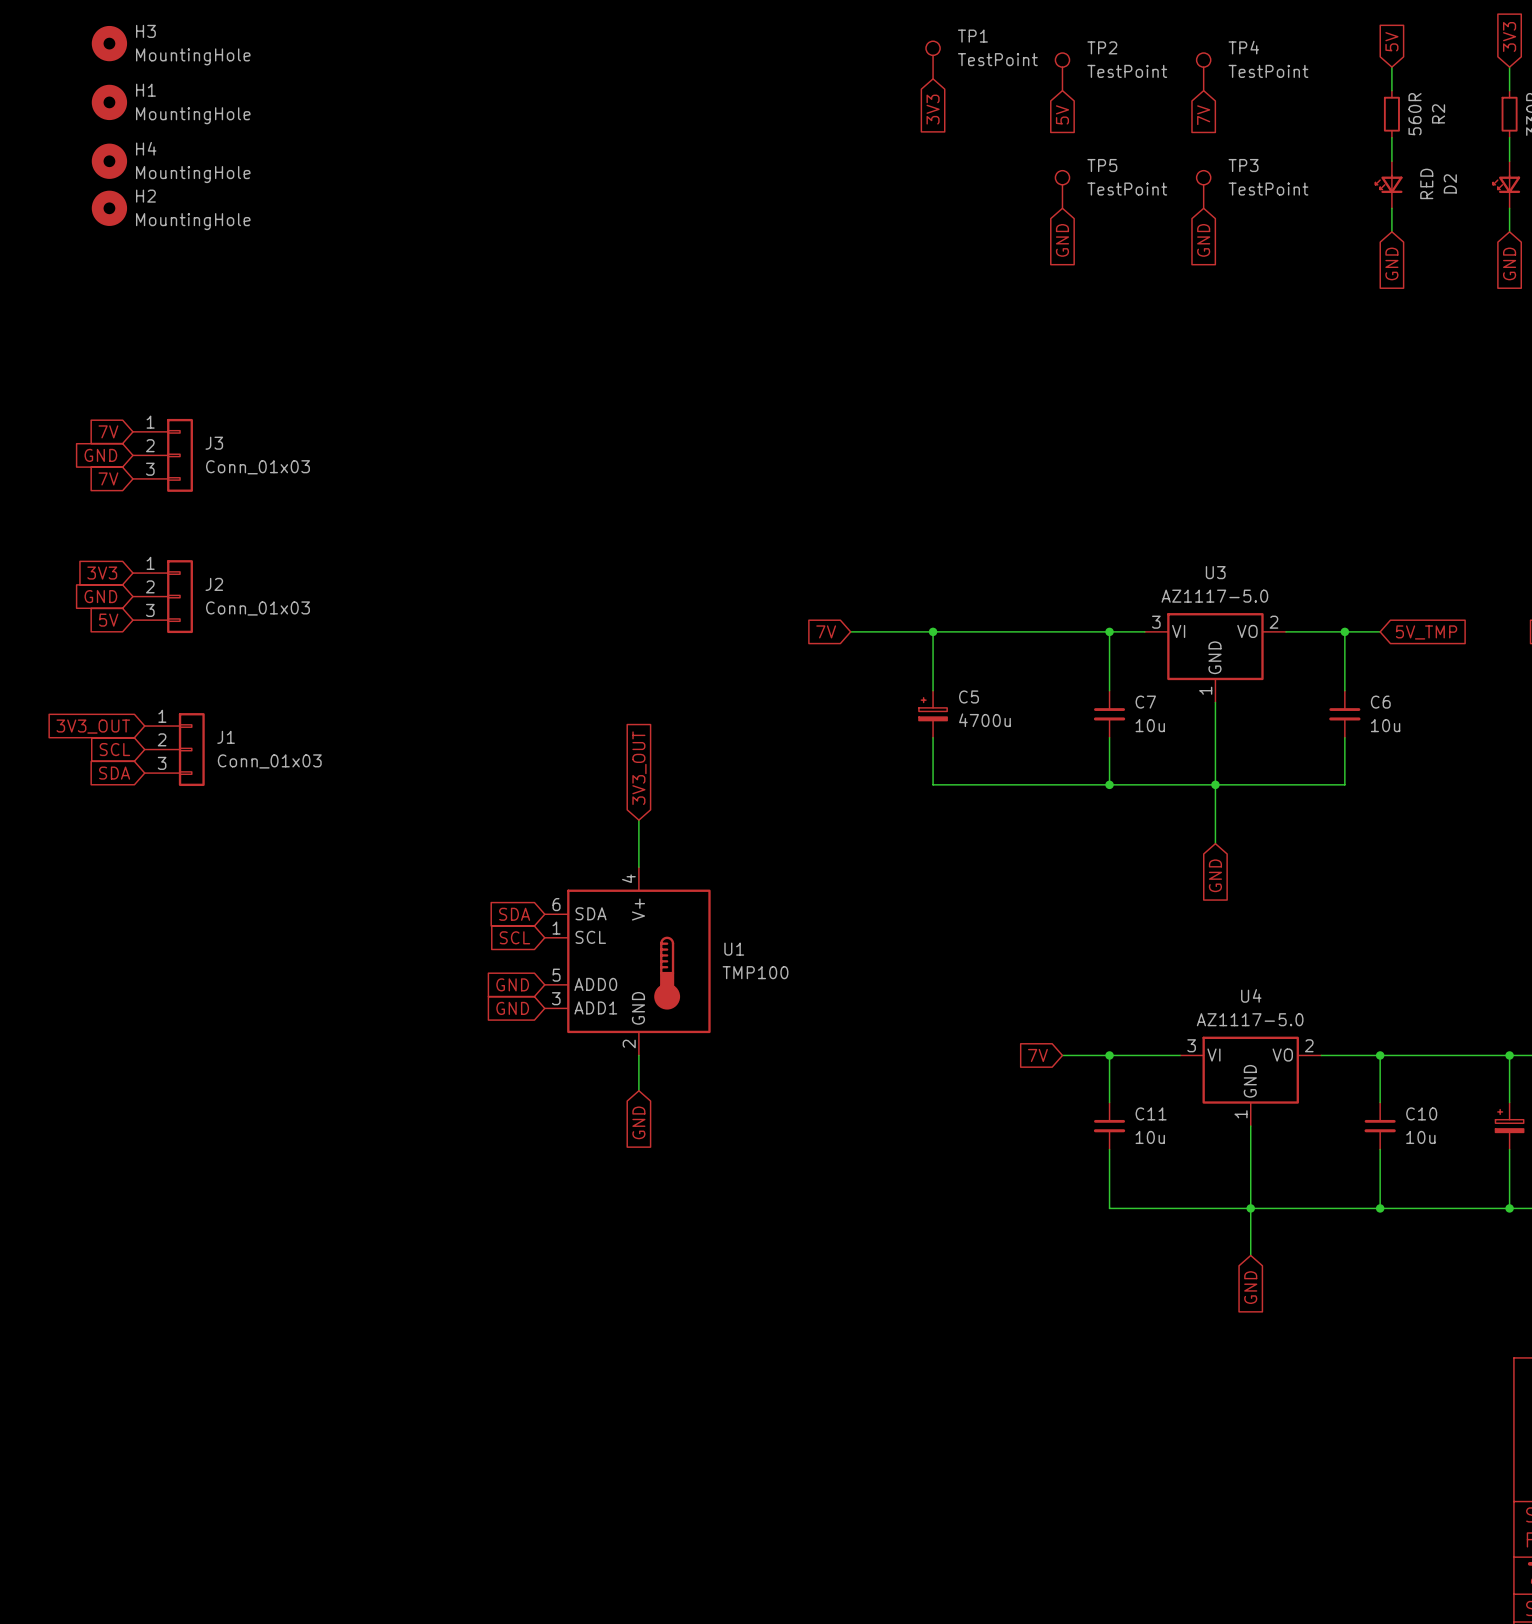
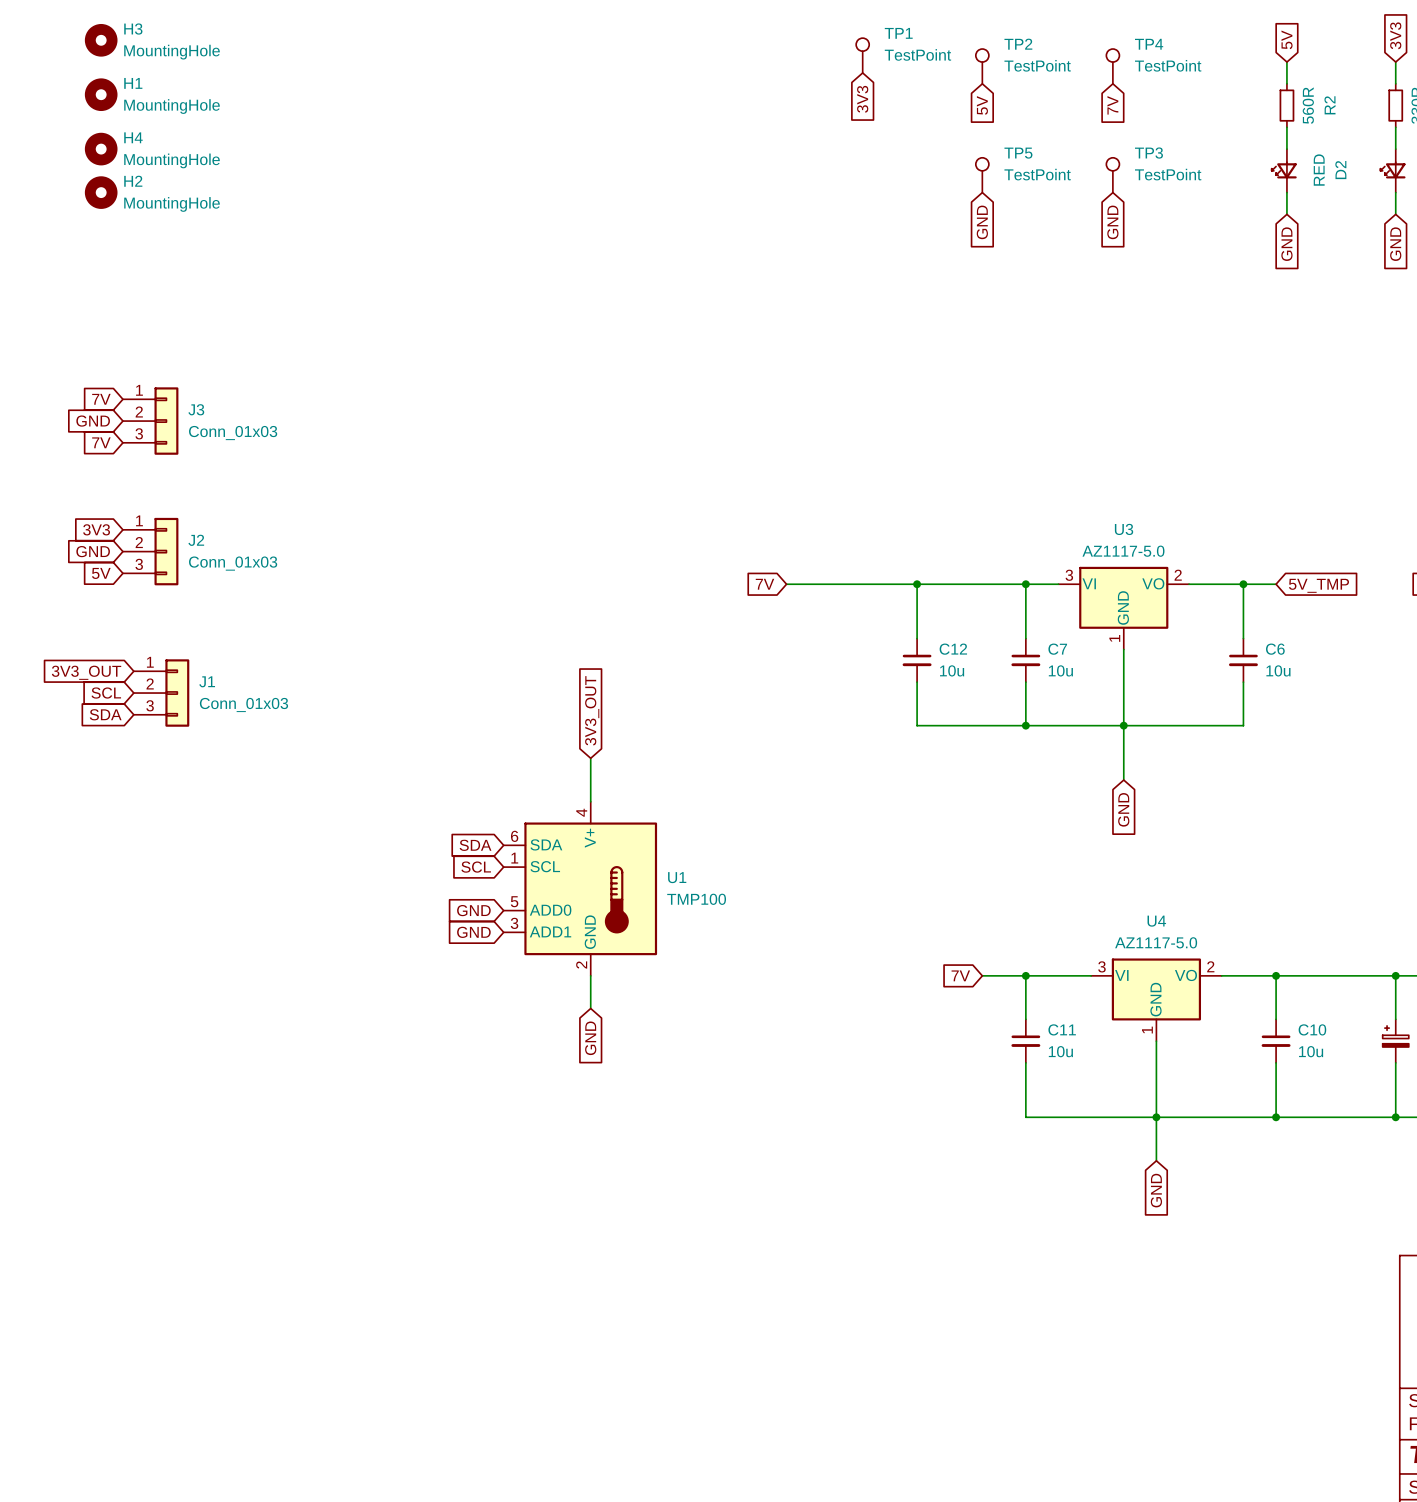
wire: (933, 631) (933, 690) -> (917, 584) (917, 638)
junction: (933, 631) -> none
junction: none -> (917, 584)
C5: 4700u (933, 714) -> none
C12: none -> 10u (917, 660)
wire: (933, 737) (933, 784) (991, 784) -> (917, 682) (917, 725)

